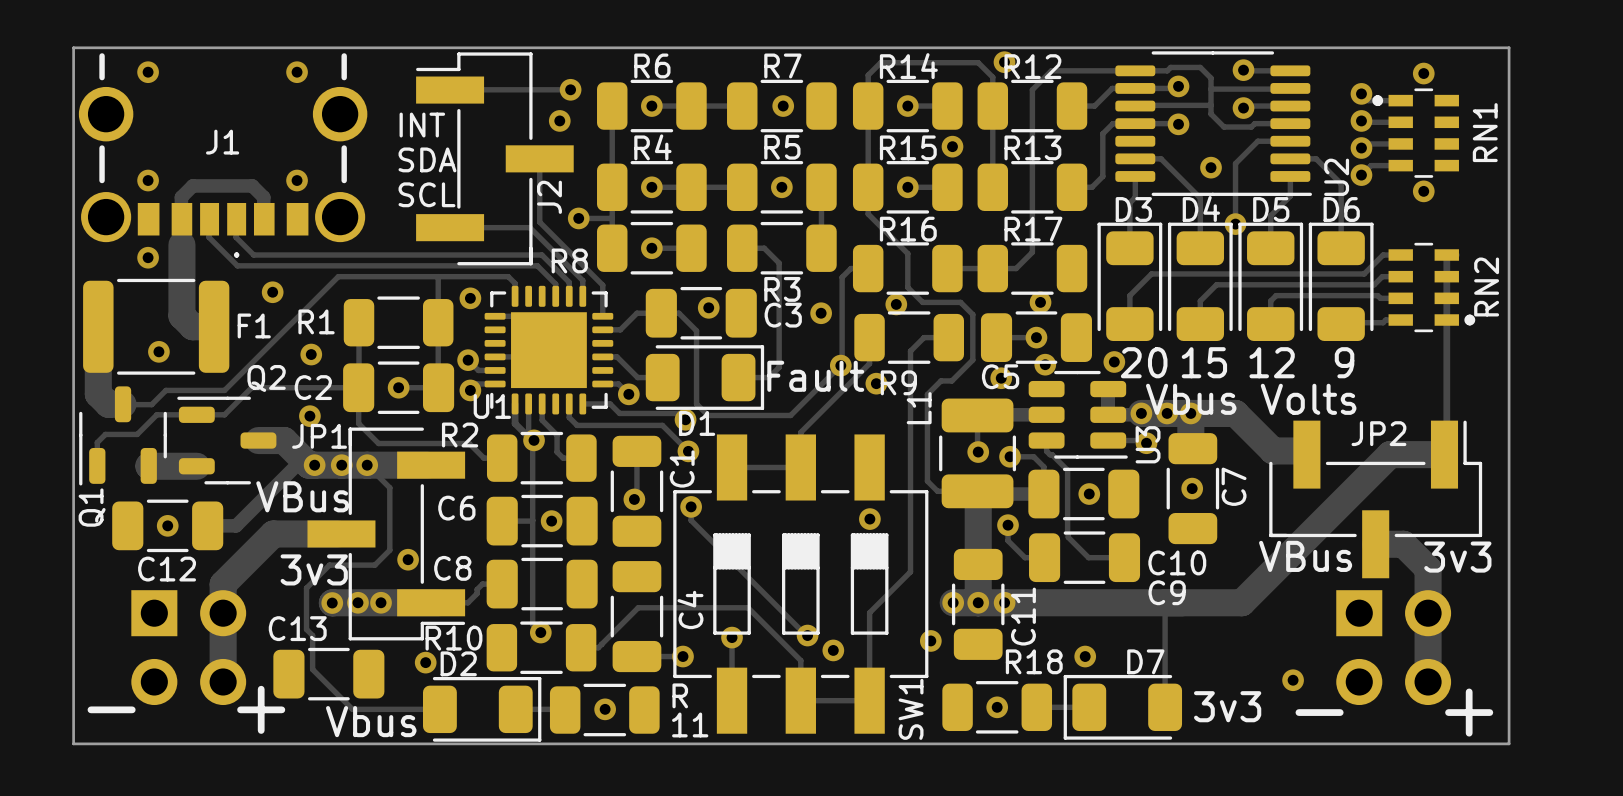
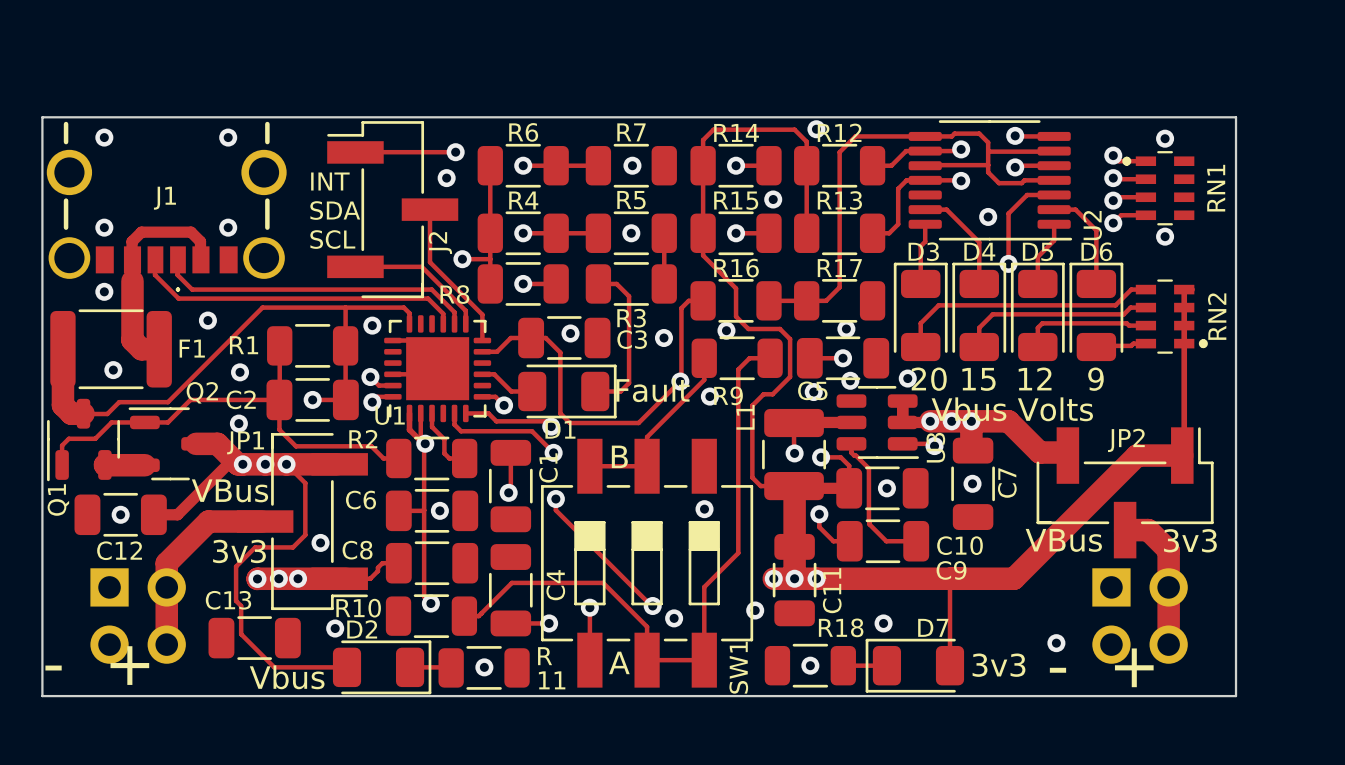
text: none -> B (619, 456)
text: none -> A (619, 662)

